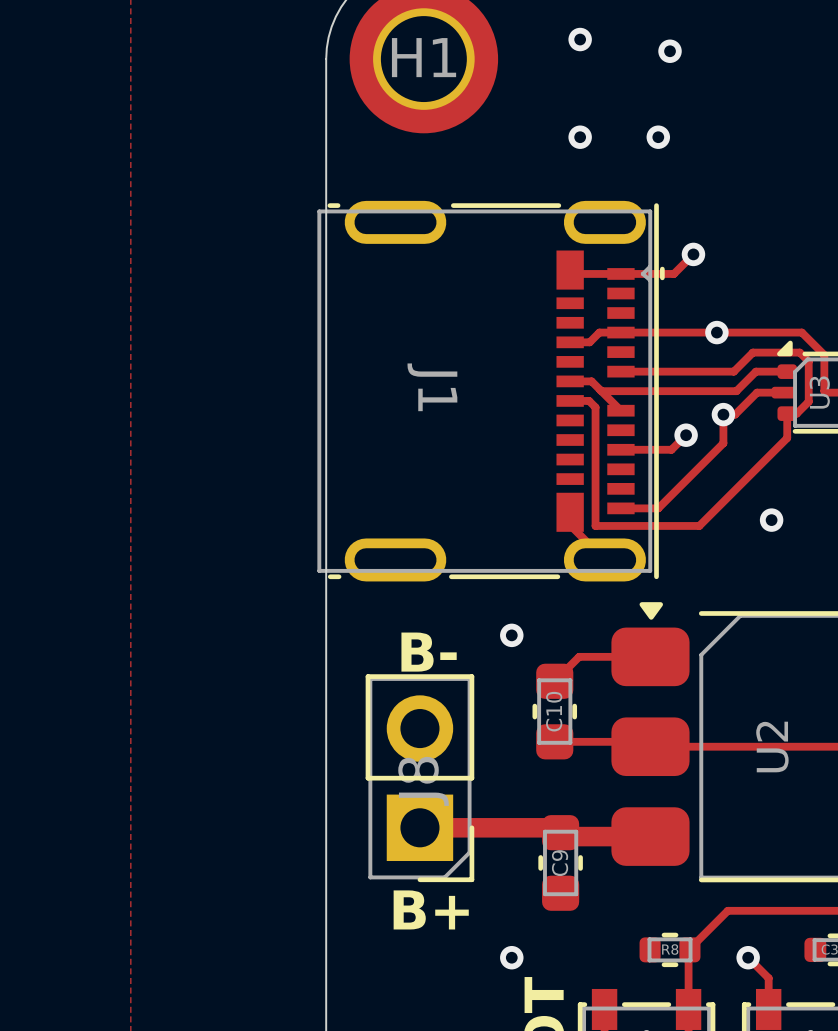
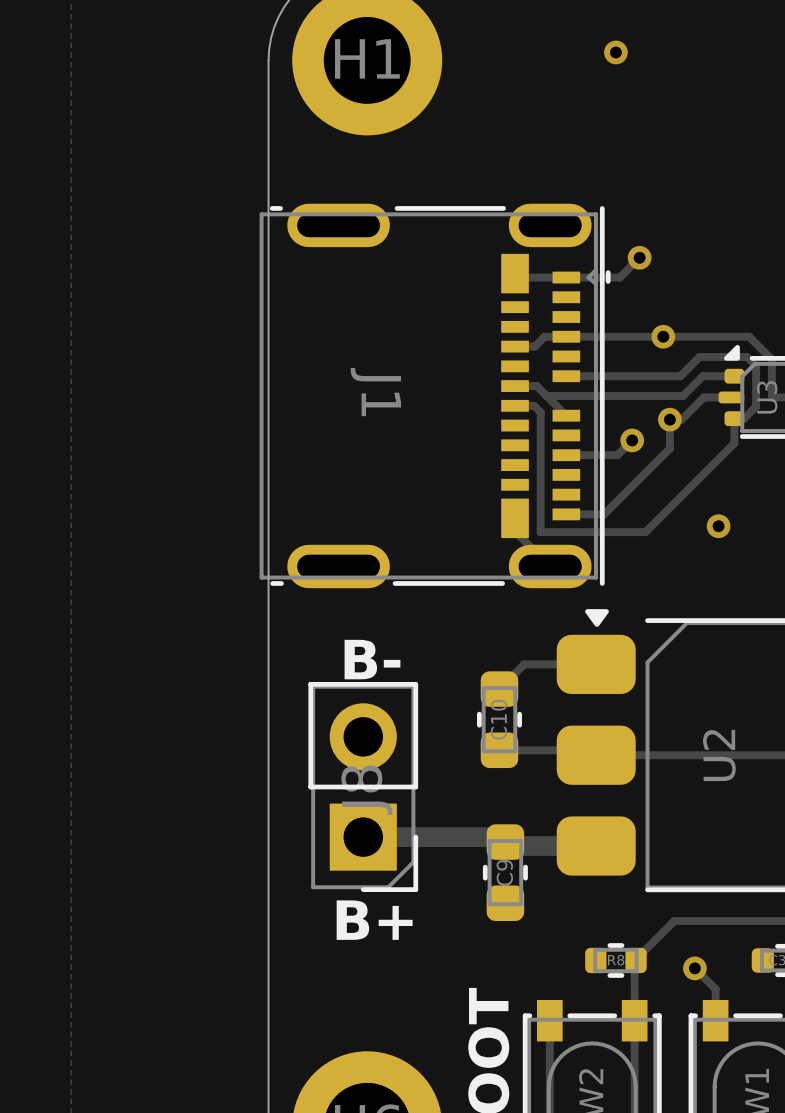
via: (580, 39) -> none
via: (580, 137) -> none
via: (658, 137) -> none
via: (511, 635) -> none
via: (511, 957) -> none

